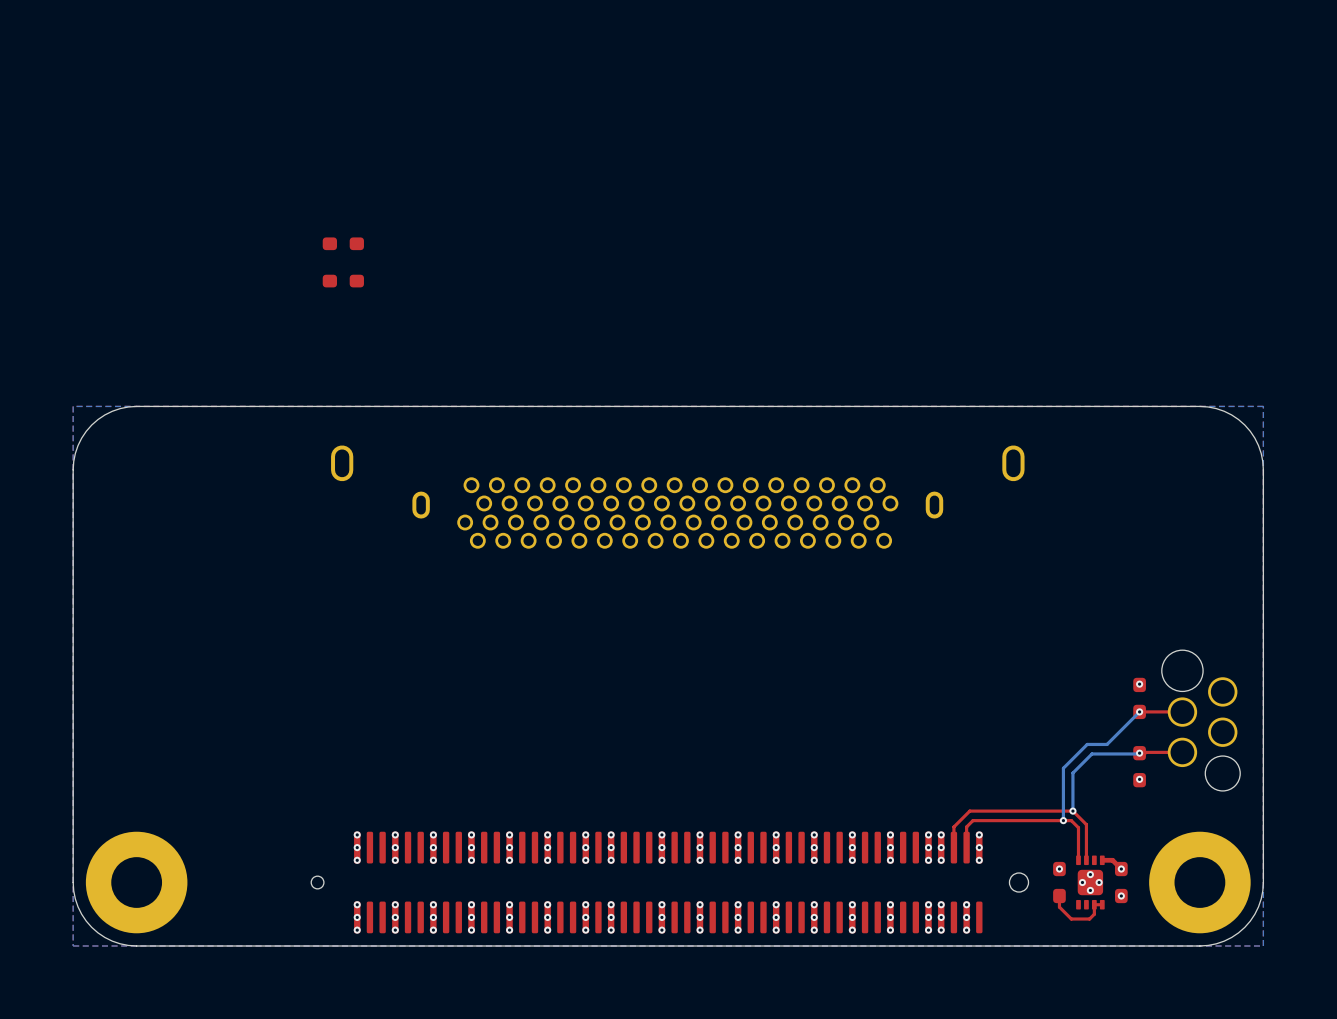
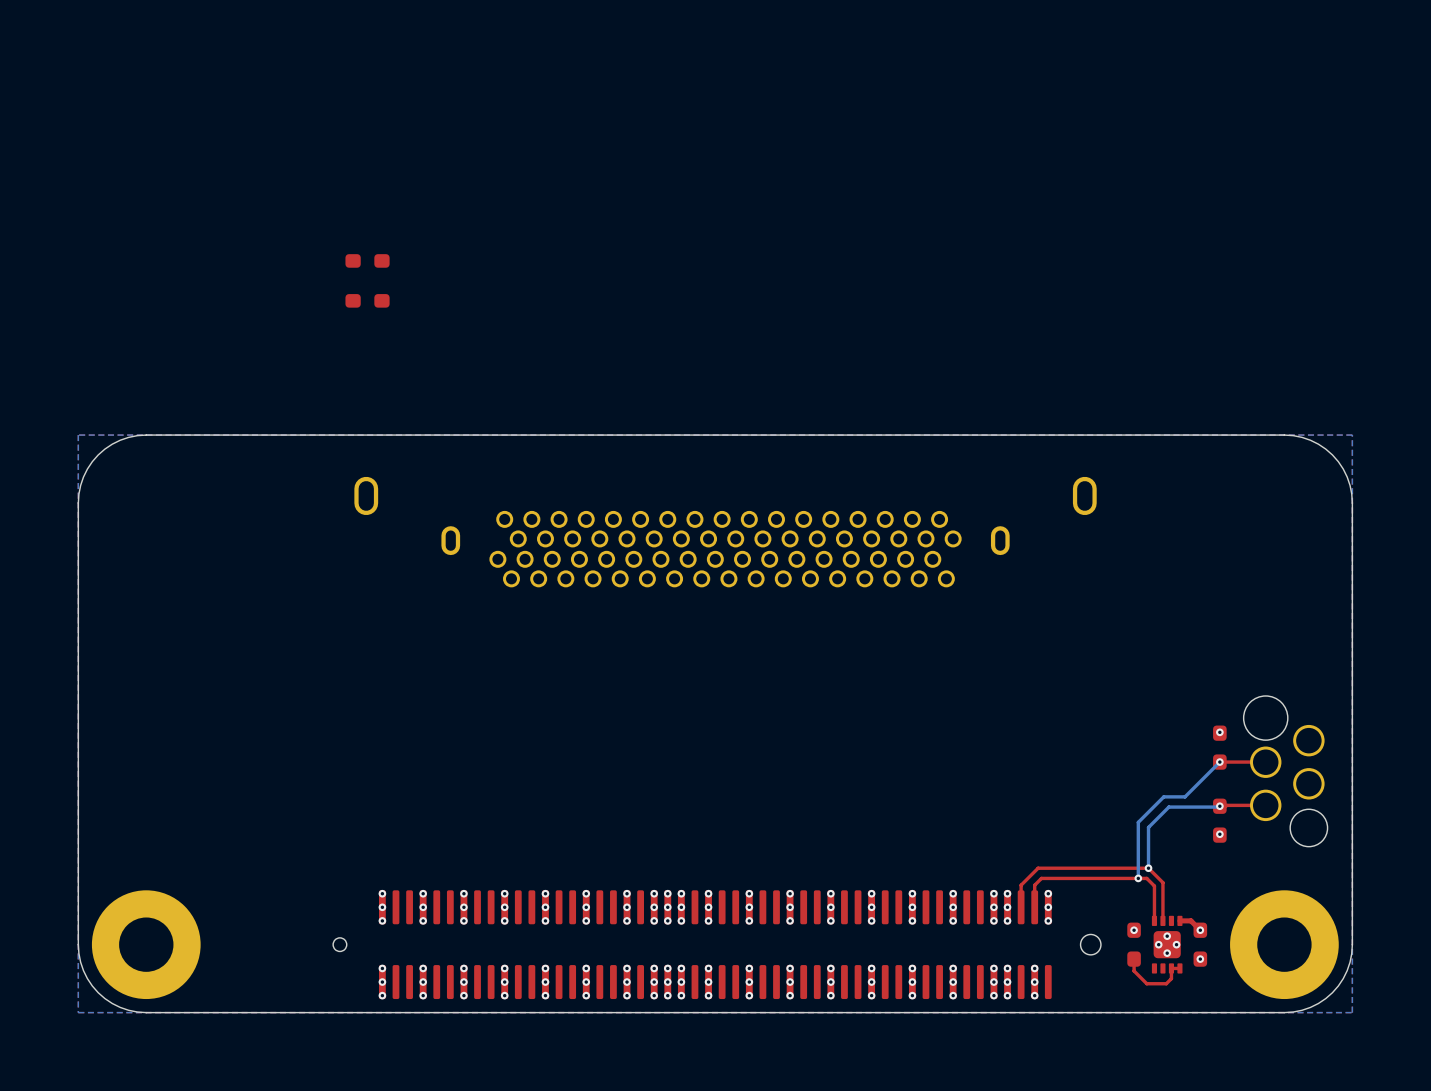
via: none -> (667, 893)
via: none -> (681, 893)
via: none -> (667, 907)
via: none -> (681, 907)
via: none -> (667, 920)
via: none -> (681, 920)
via: none -> (667, 968)
via: none -> (681, 968)
via: none -> (667, 982)
via: none -> (681, 982)
via: none -> (667, 995)
via: none -> (681, 995)

